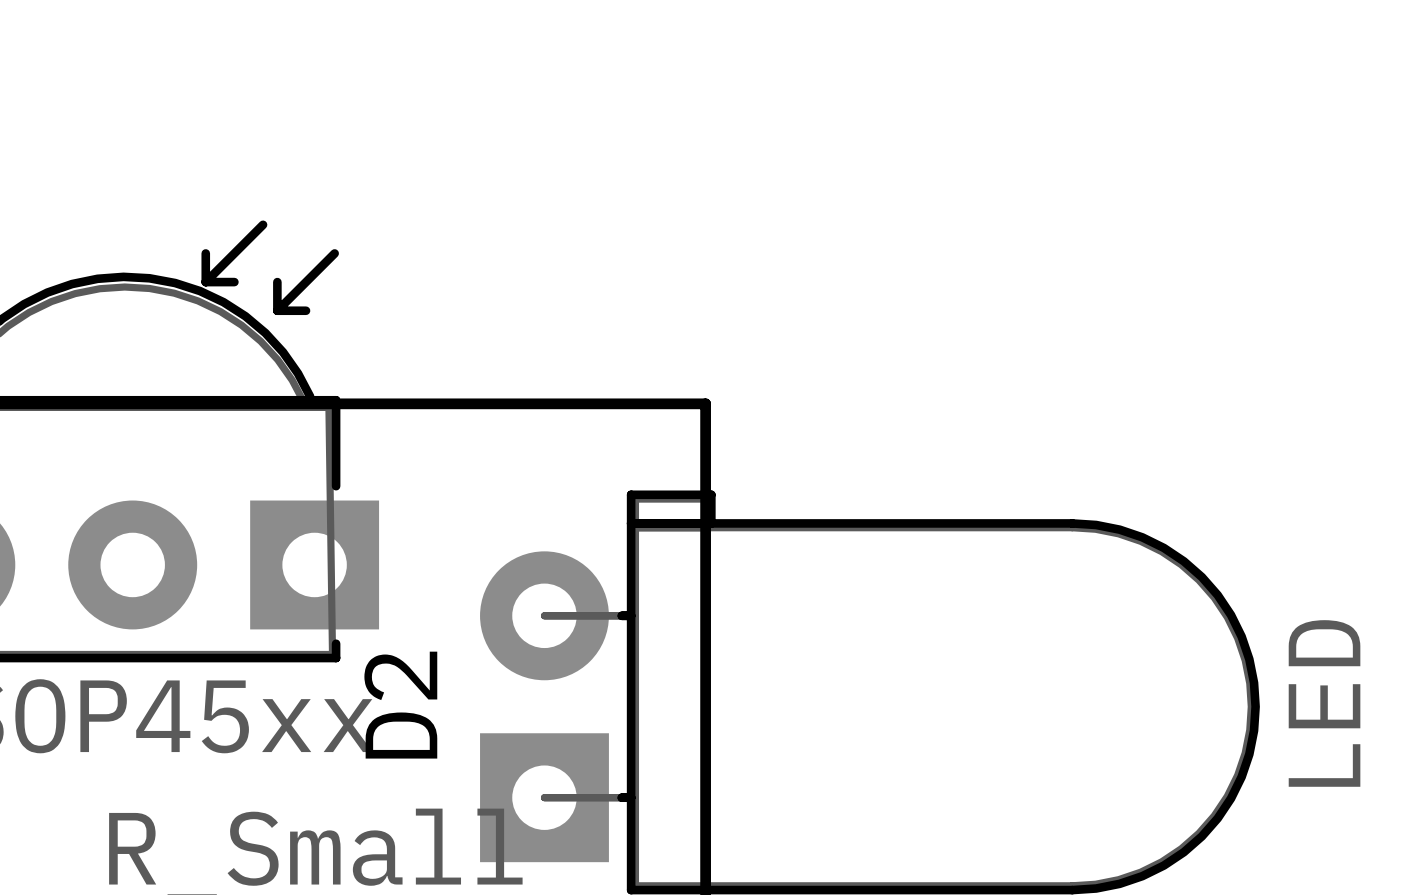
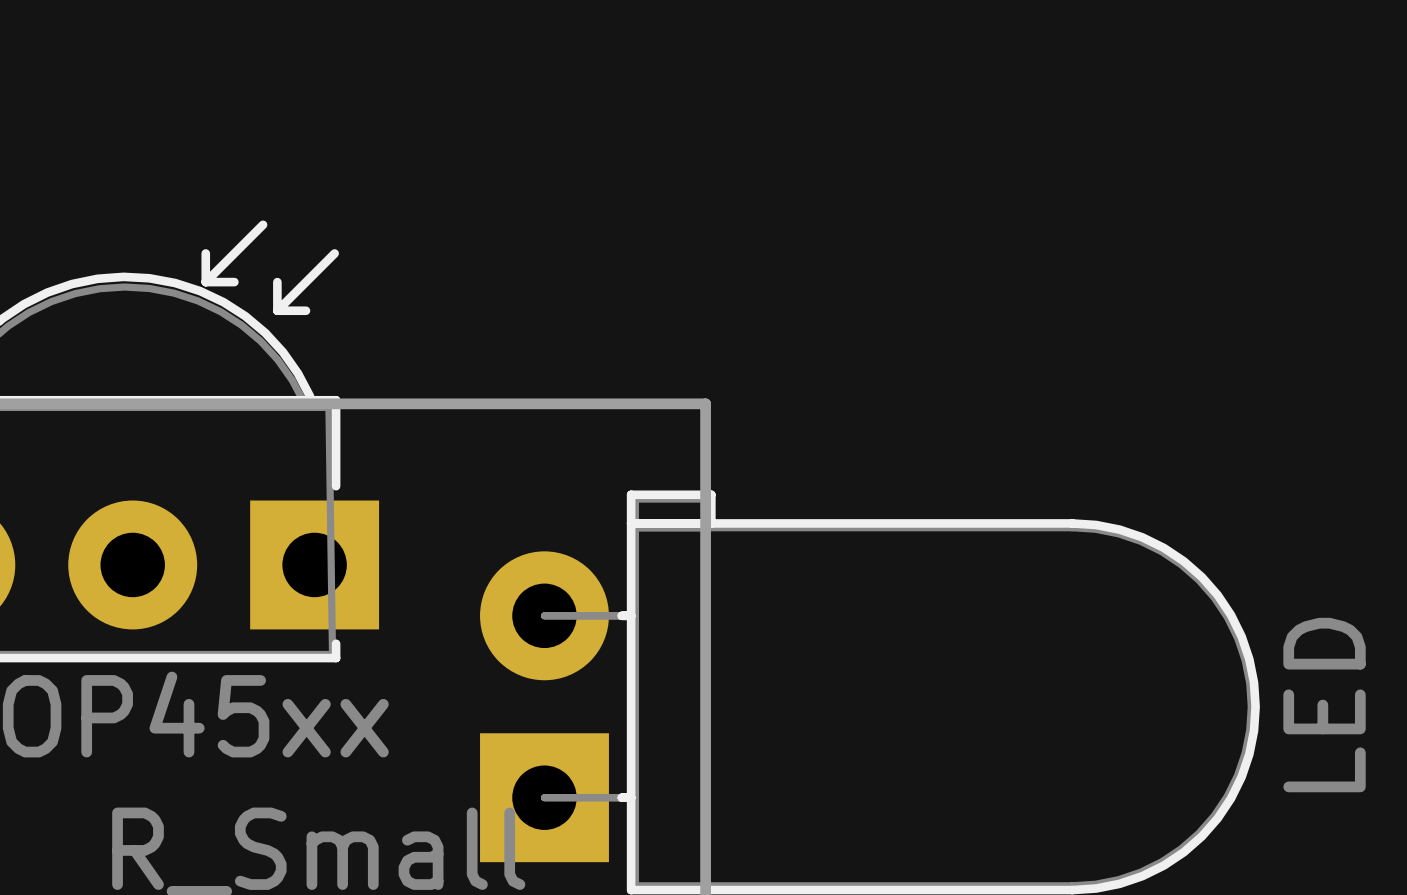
D2 name: D2 (400, 705) -> none

